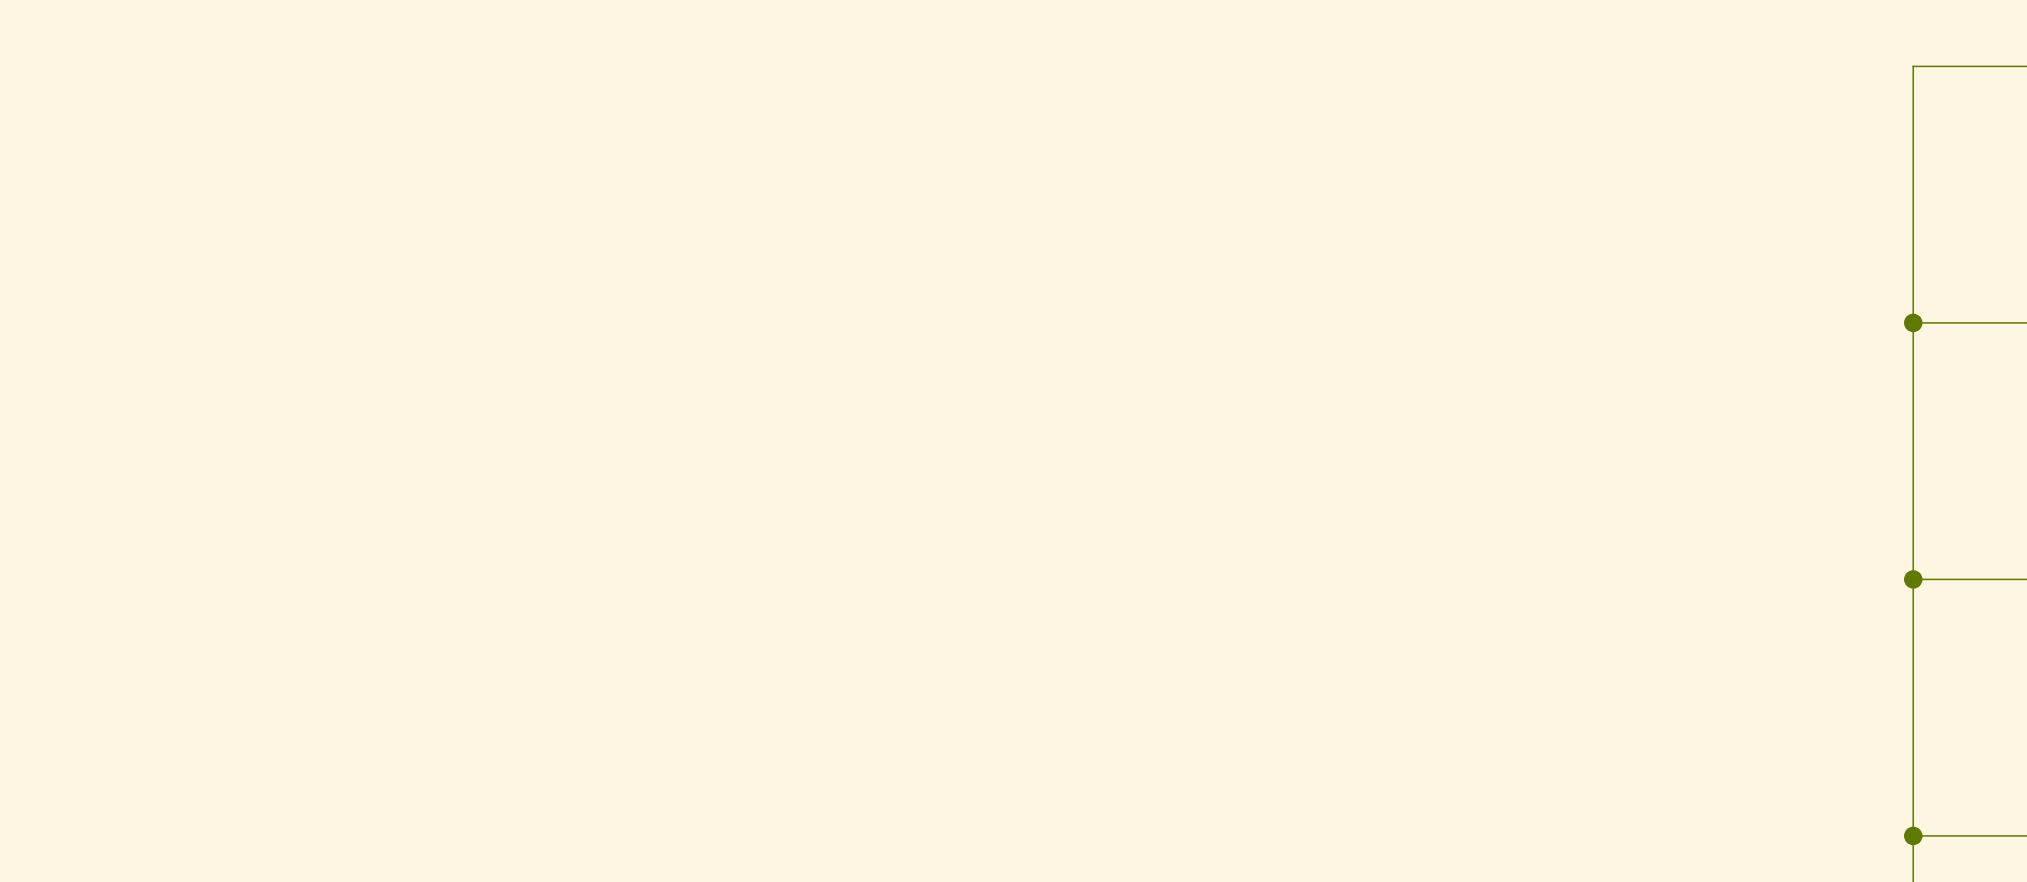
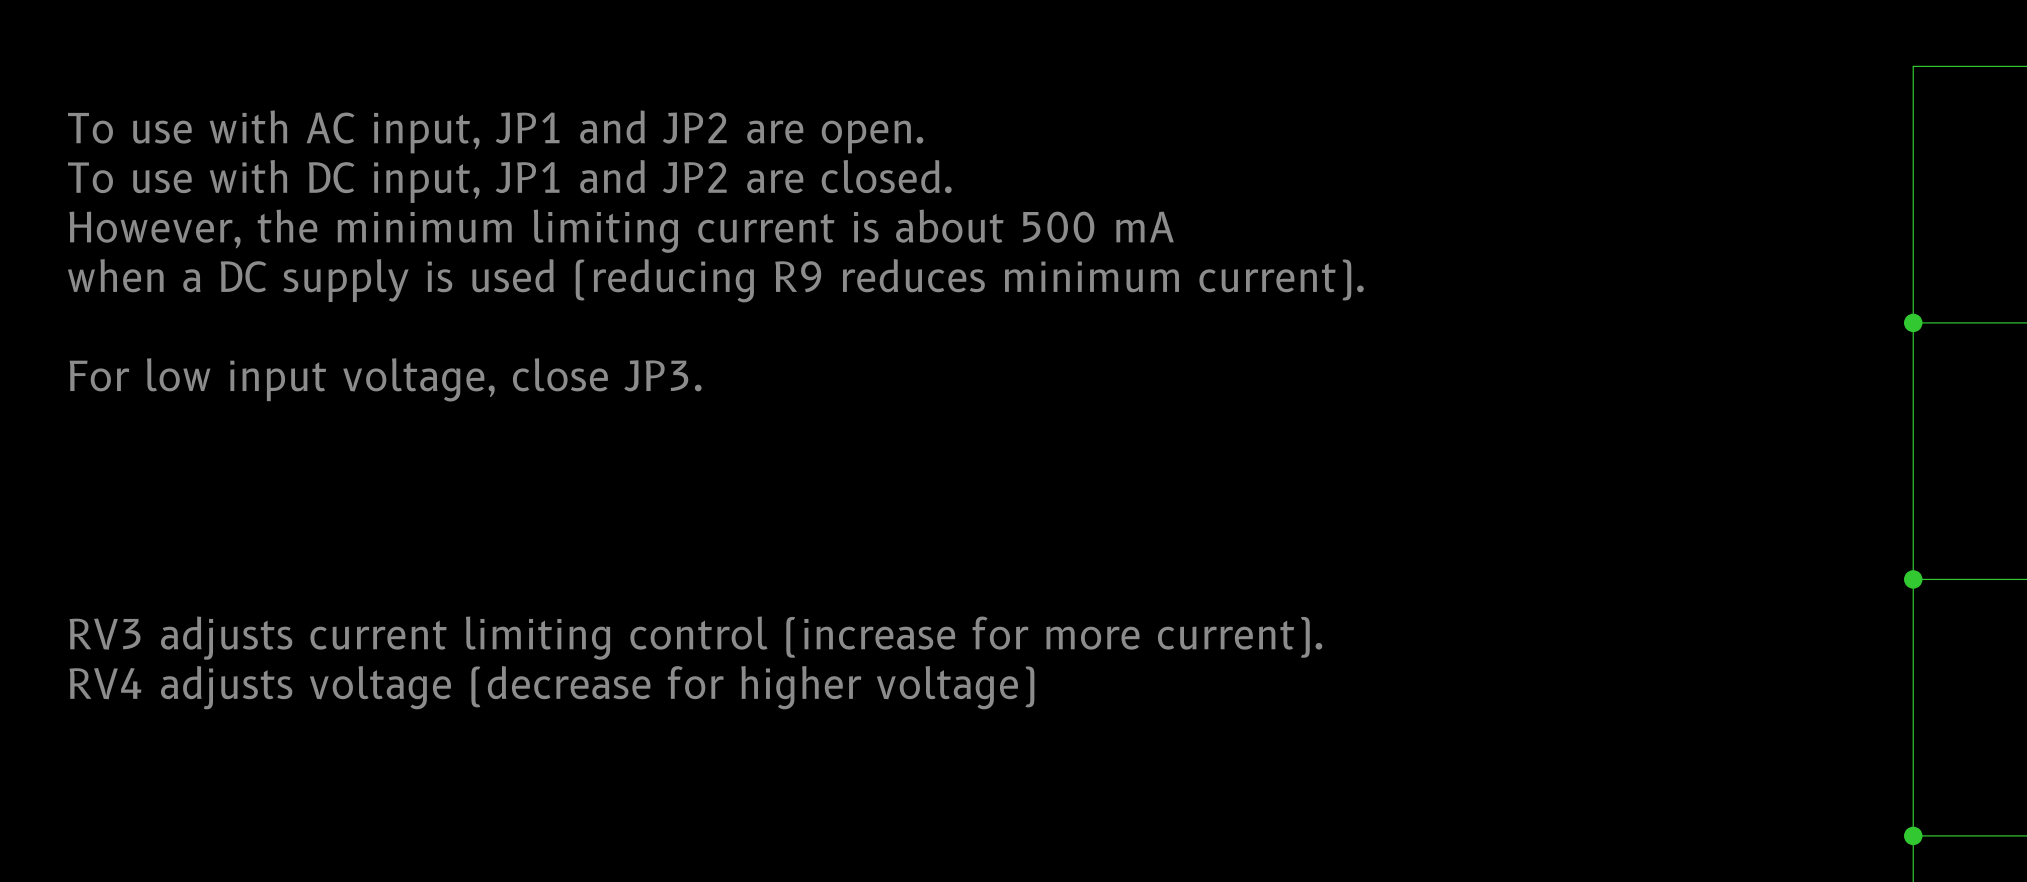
text: none -> To use with AC input, JP1 and JP2 are open. (495, 131)
text: none -> To use with DC input, JP1 and JP2 are closed. (509, 181)
text: none -> However, the minimum limiting current is about 500 mA (621, 231)
text: none -> when a DC supply is used (reducing R9 reduces minimum current). (715, 280)
text: none -> For low input voltage, close JP3. (385, 379)
text: none -> RV3 adjusts current limiting control (increase for more current). (695, 638)
text: none -> RV4 adjusts voltage (decrease for higher voltage) (551, 687)

